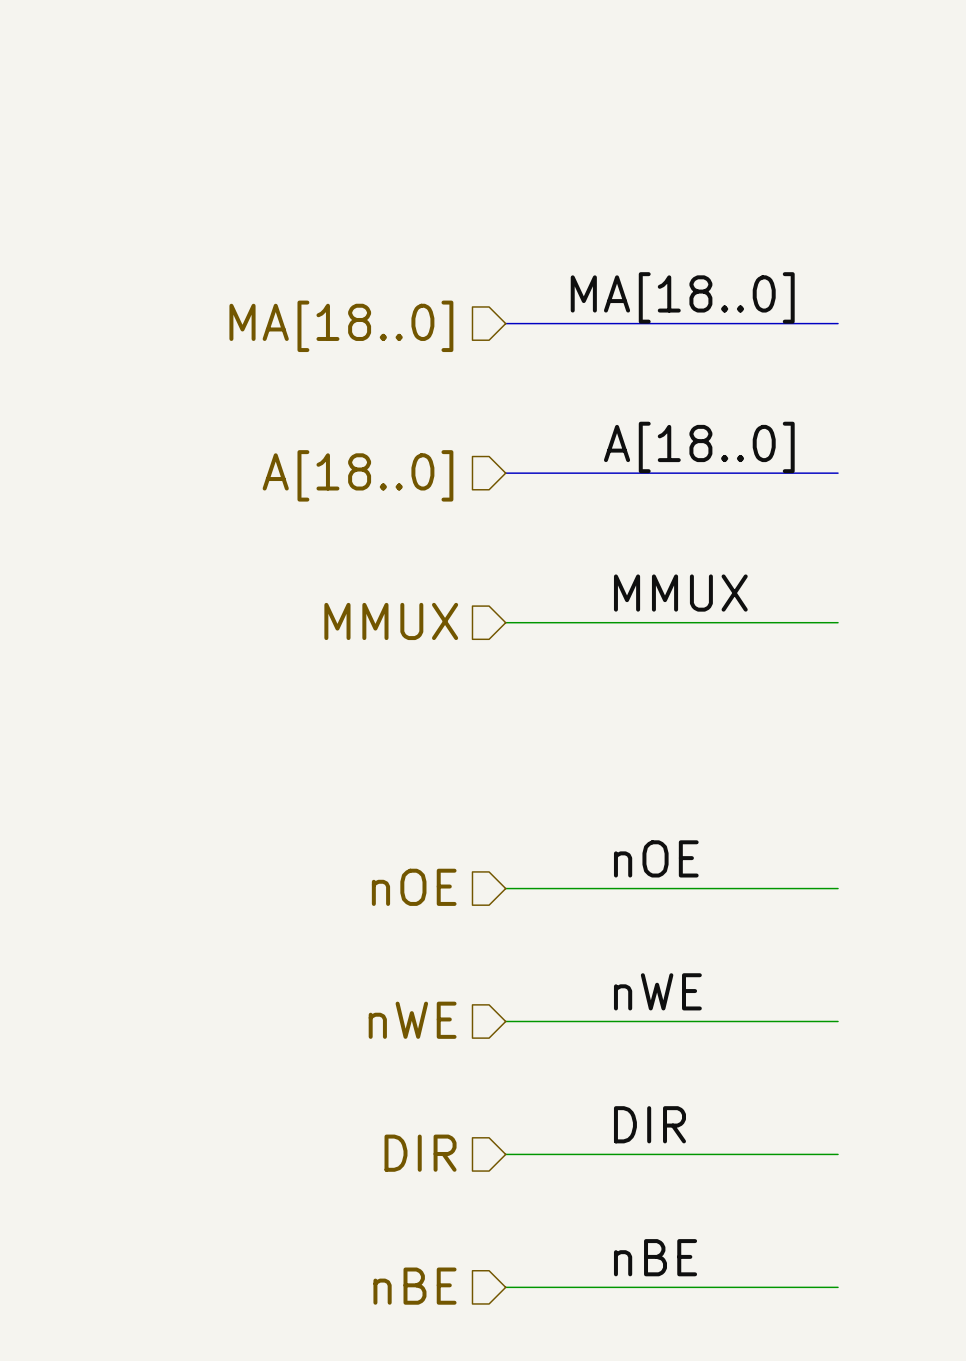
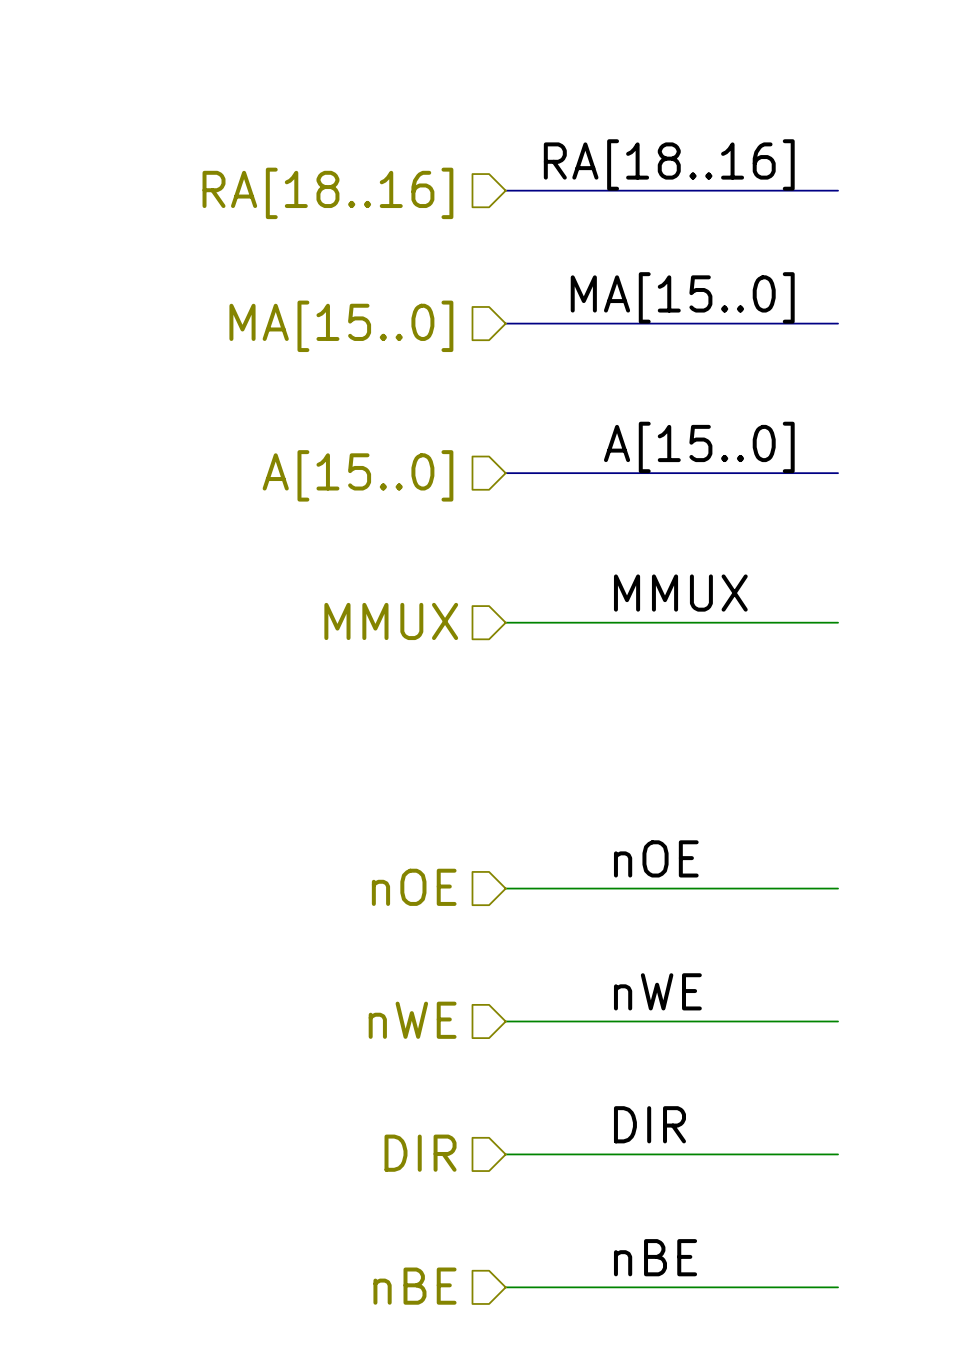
label: none -> RA[18..16] (669, 164)
bus: none -> (505, 190) (838, 190)
hierarchical label: none -> RA[18..16] (327, 193)
label: MA[18..0] (682, 297) -> MA[15..0] (682, 297)
hierarchical label: MA[18..0] (341, 326) -> MA[15..0] (341, 326)
label: A[18..0] (699, 447) -> A[15..0] (699, 447)
hierarchical label: A[18..0] (358, 475) -> A[15..0] (358, 475)

